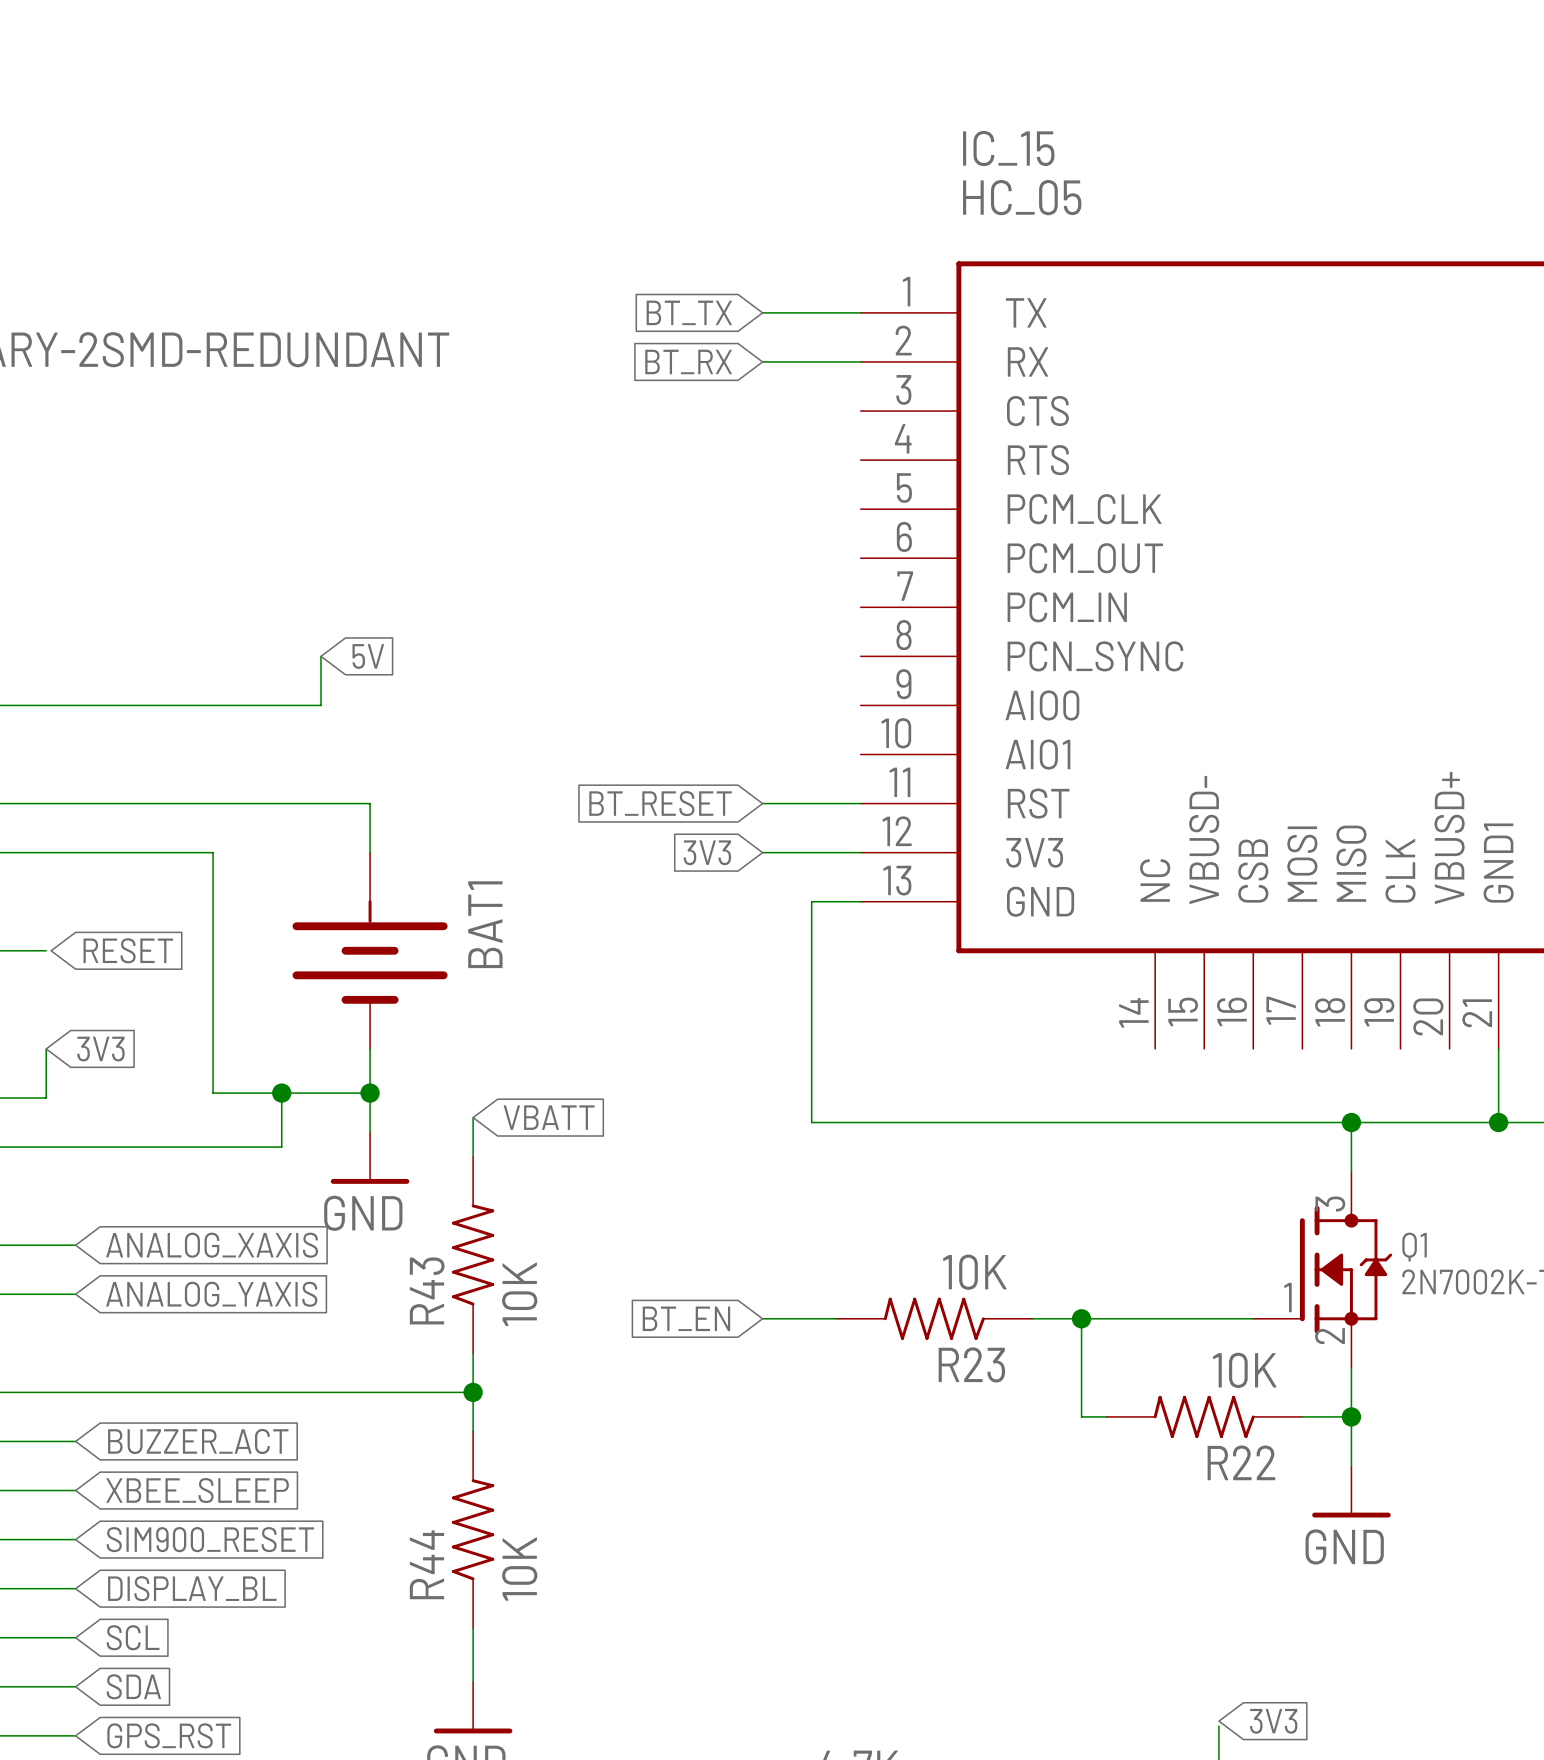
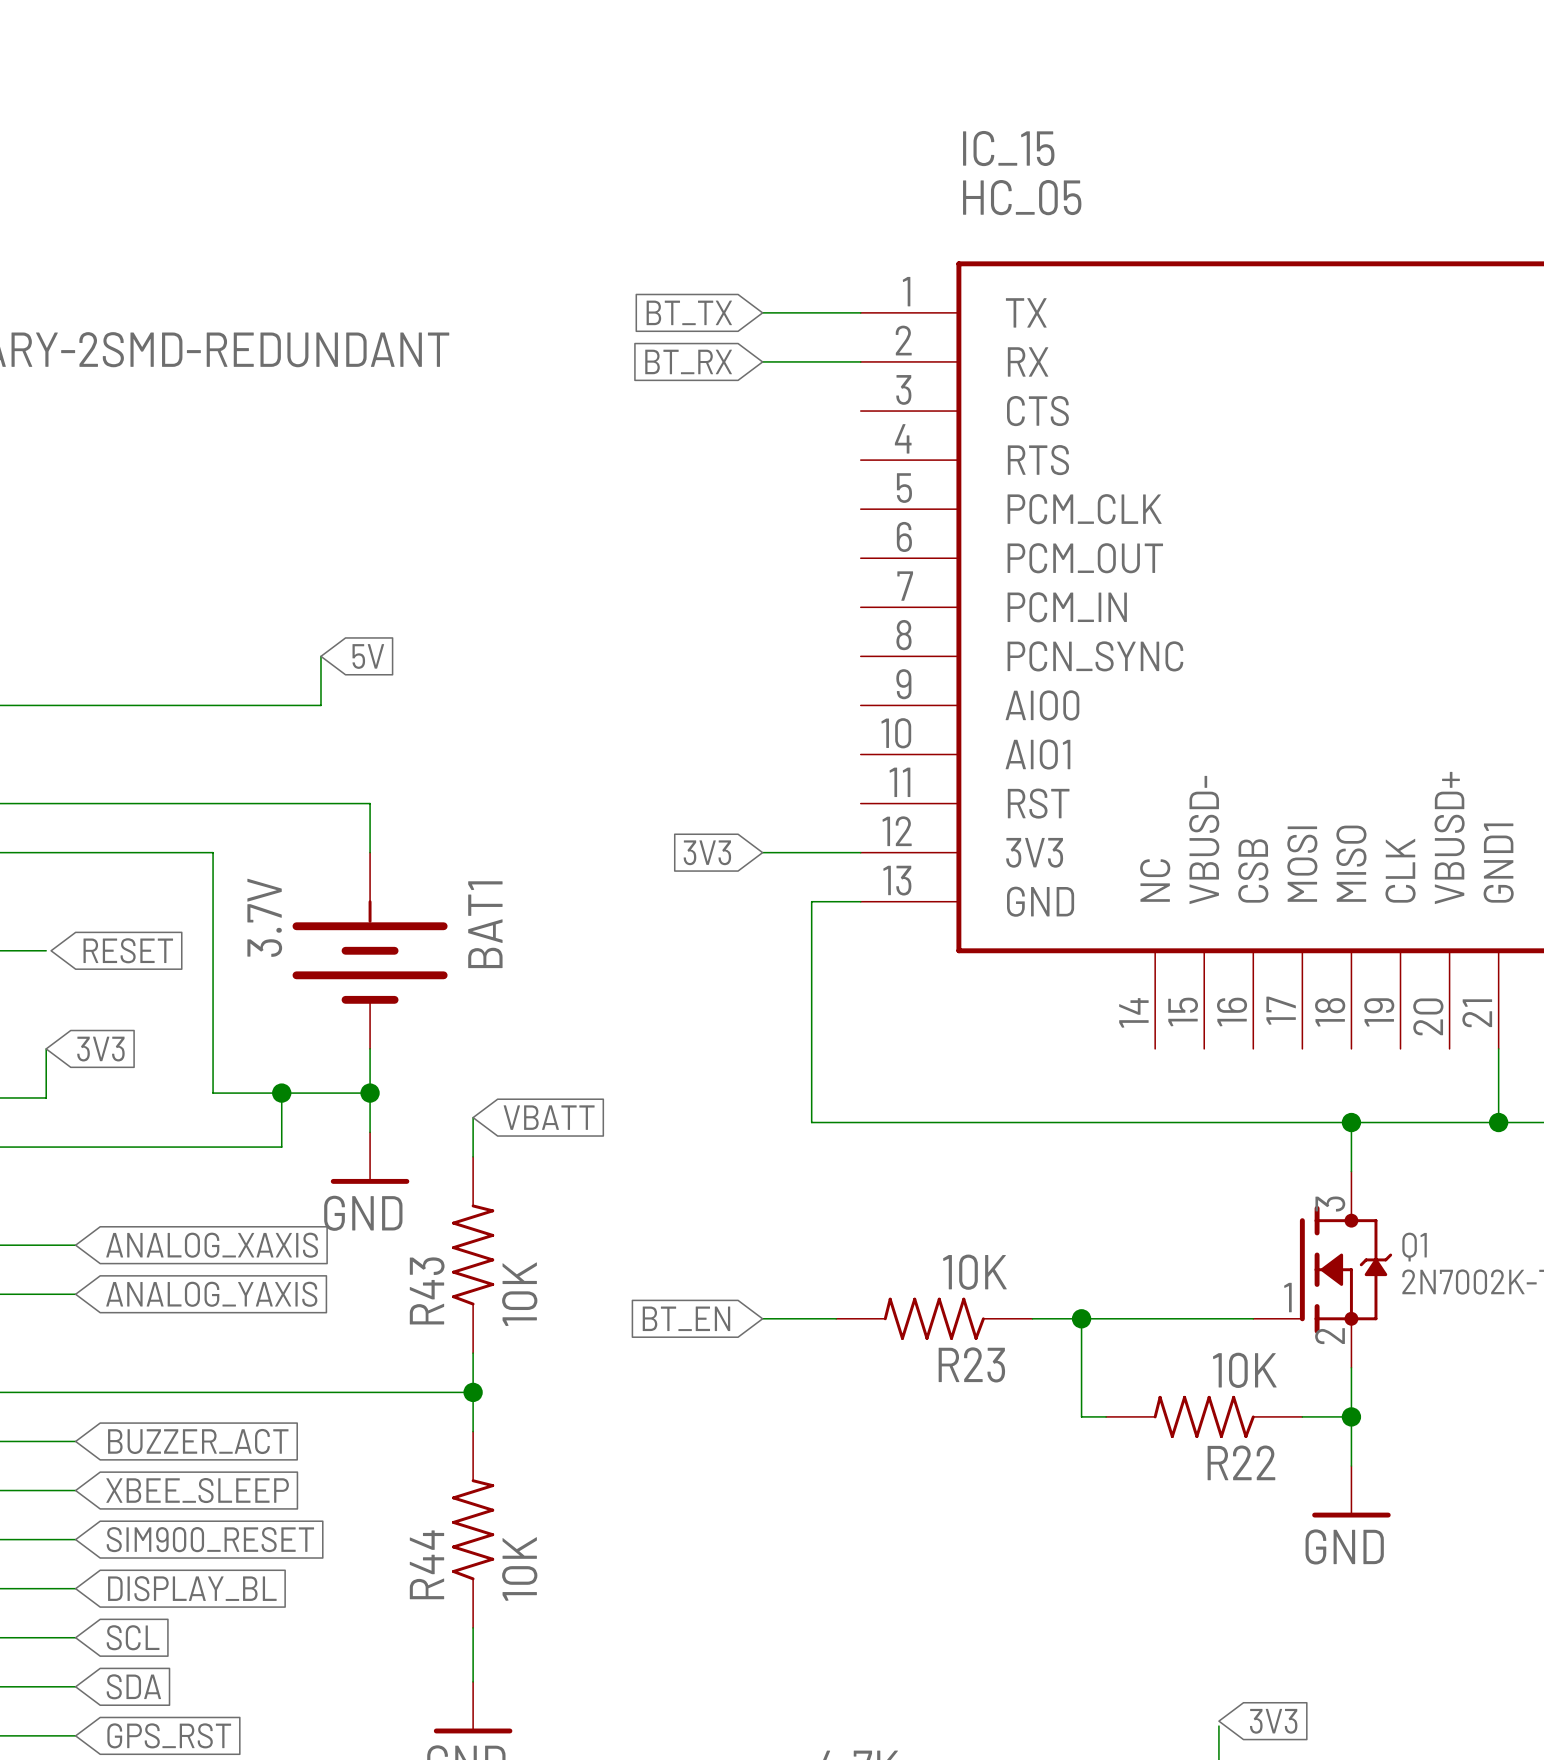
global label: BT_RESET (660, 803) -> none
wire: (762, 803) (860, 803) -> none
BAT1 value: none -> 3.7V (264, 917)

